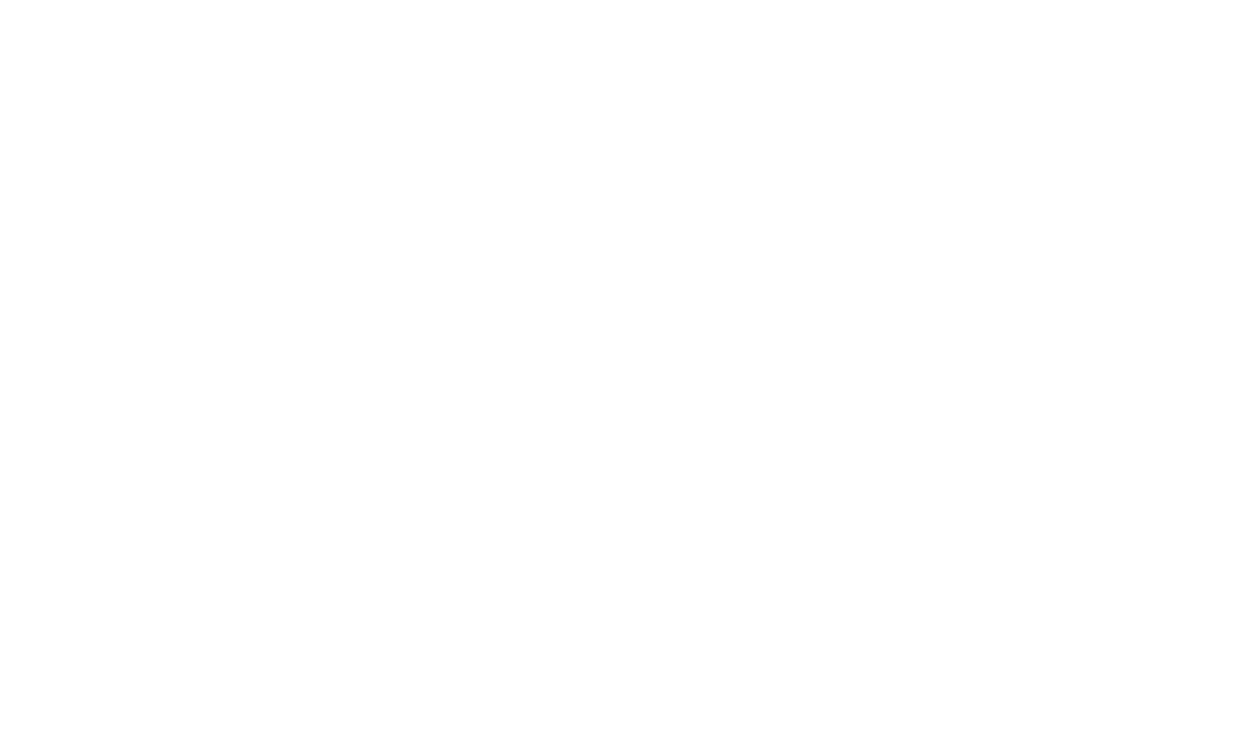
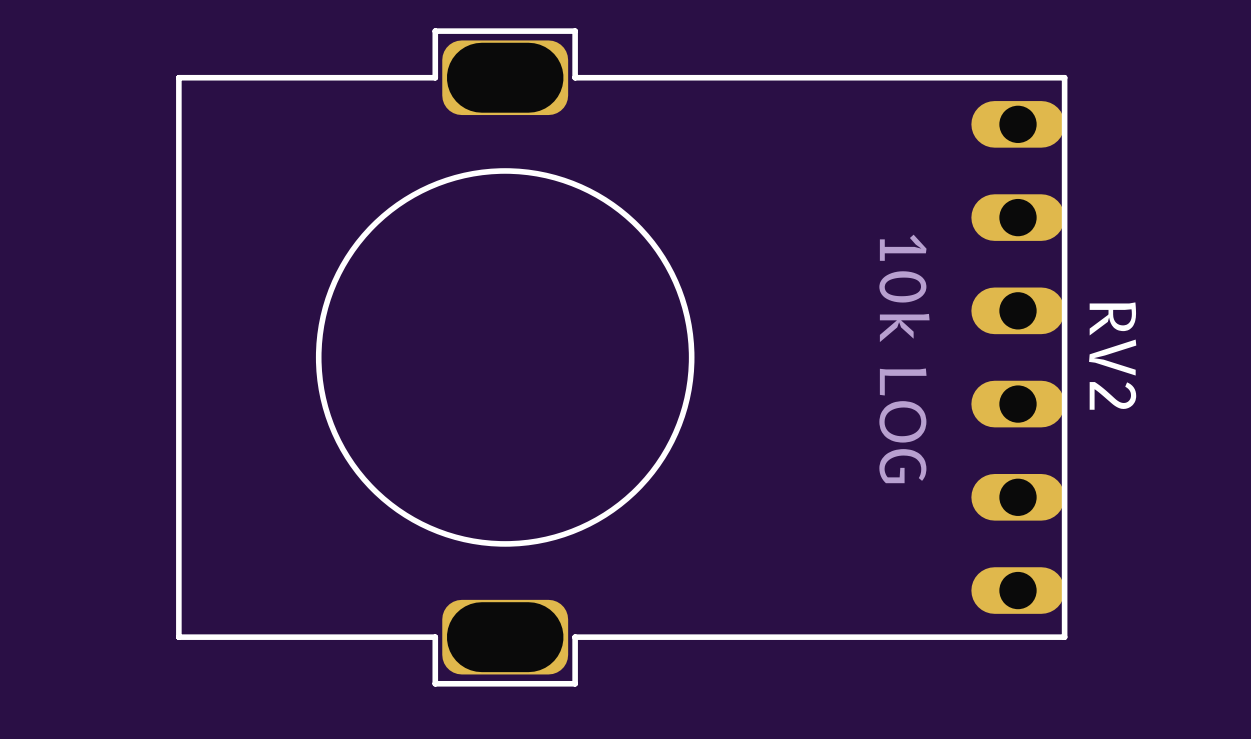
RV2: none -> 10k LOG (621, 357)

